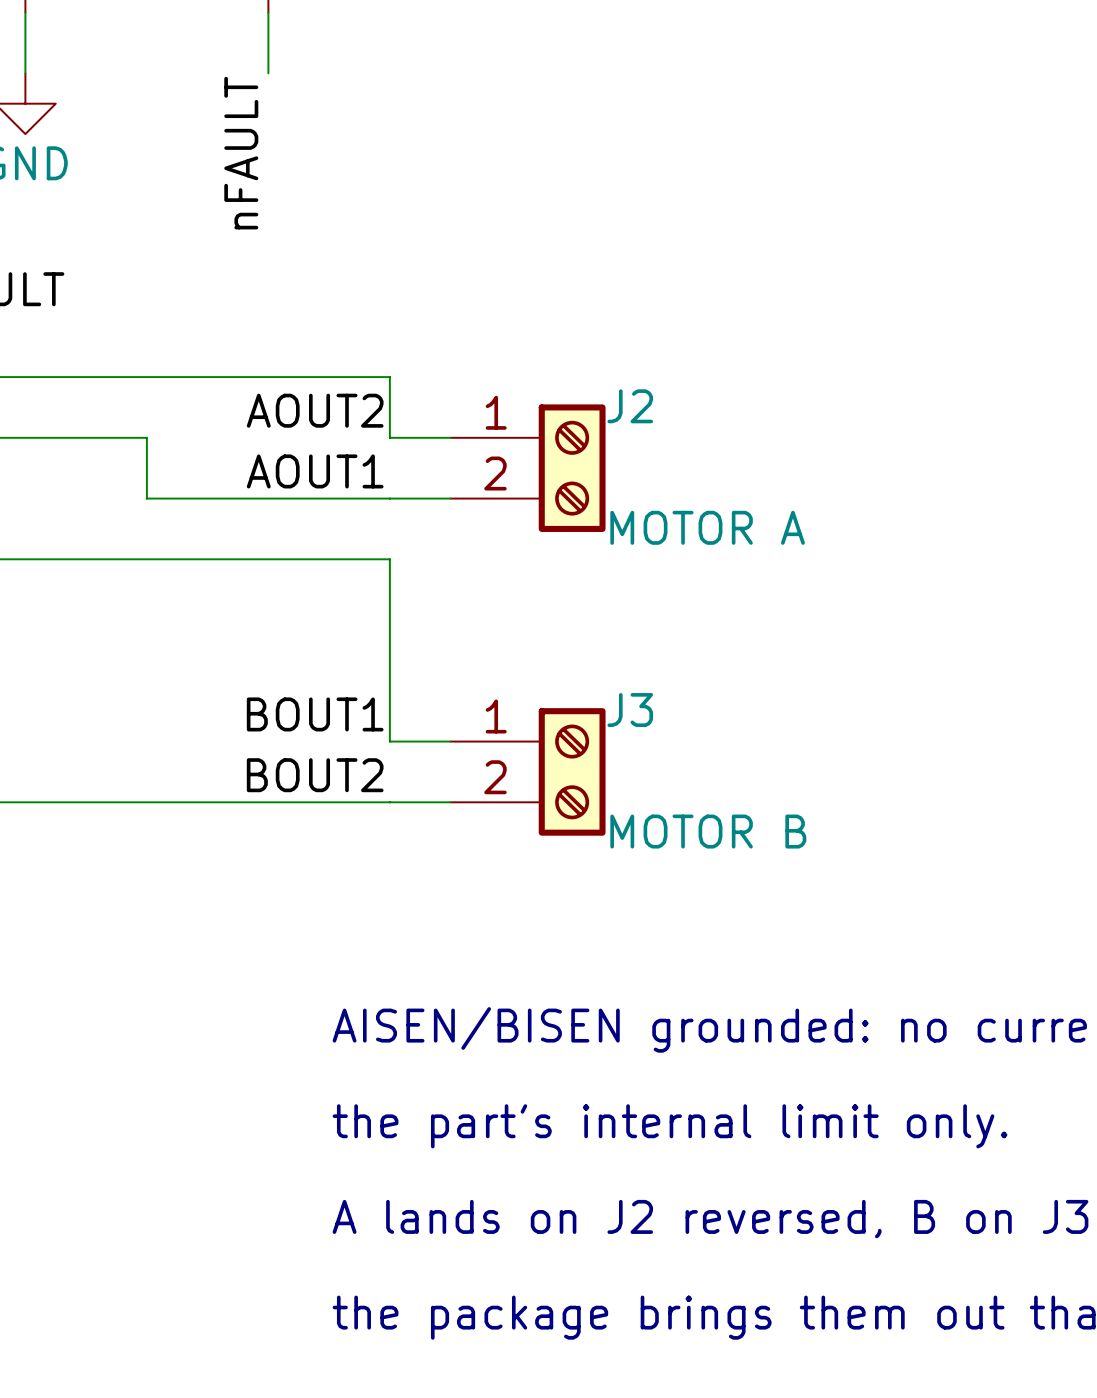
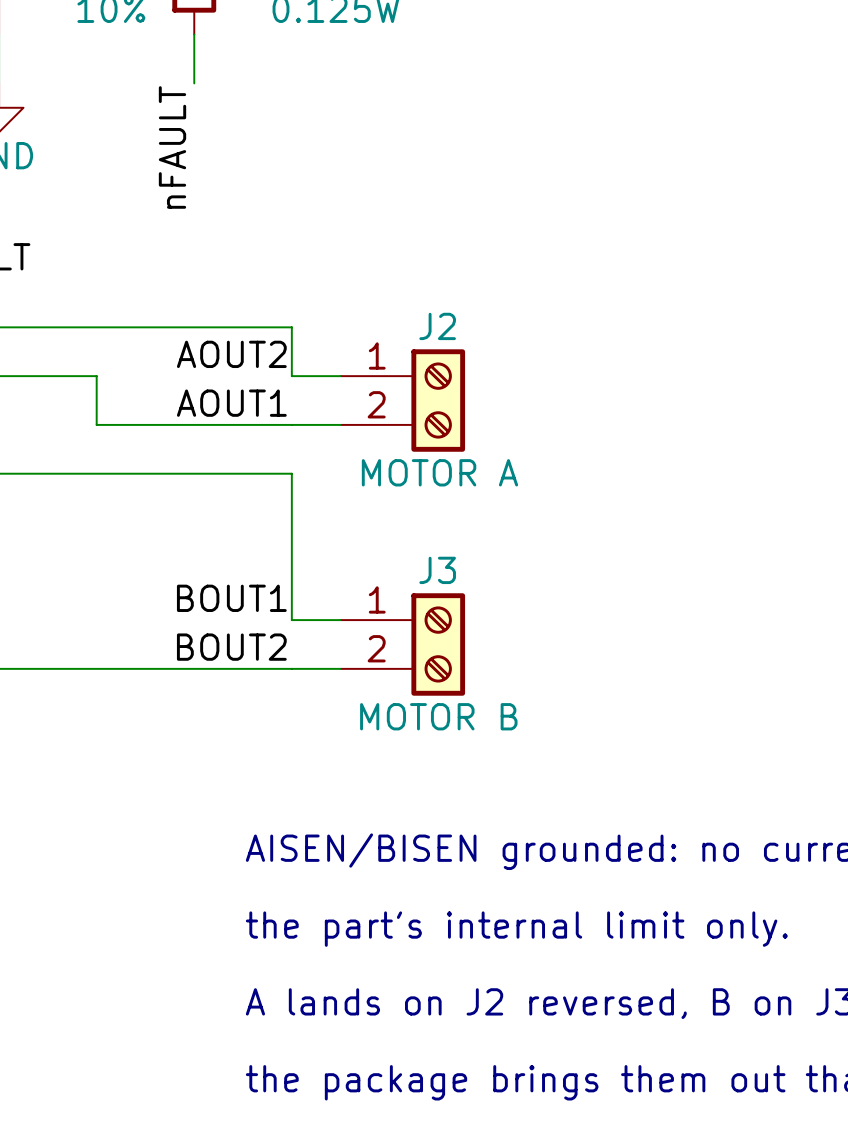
J2 name position: J2 (630, 406) -> J2 (437, 326)
J2 value position: MOTOR A (707, 527) -> MOTOR A (439, 472)
J3 name position: J3 (630, 710) -> J3 (437, 570)
J3 value position: MOTOR B (708, 831) -> MOTOR B (438, 716)

